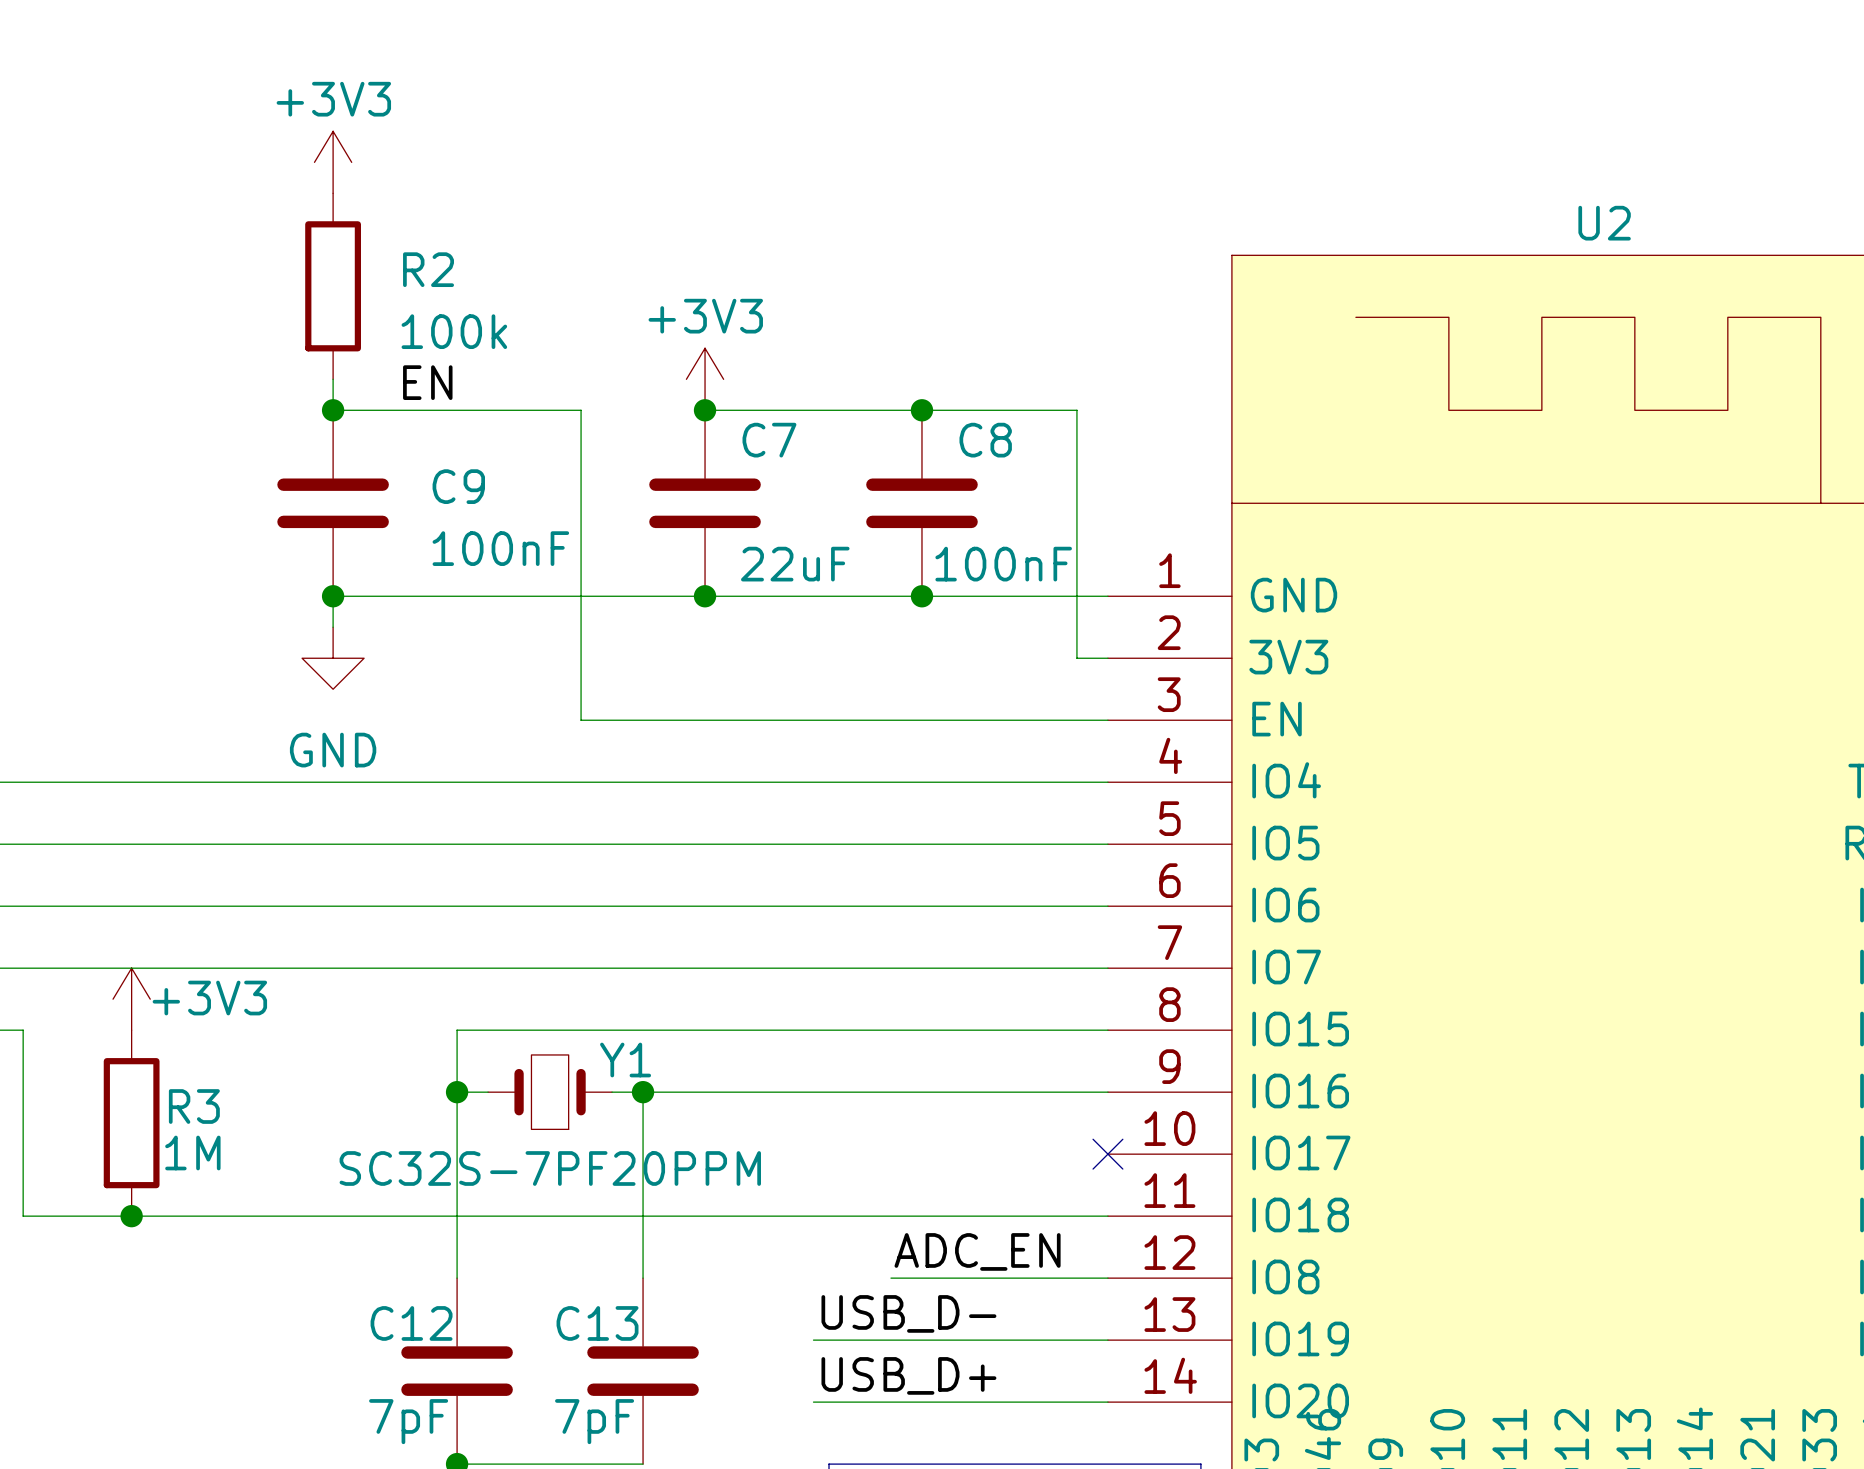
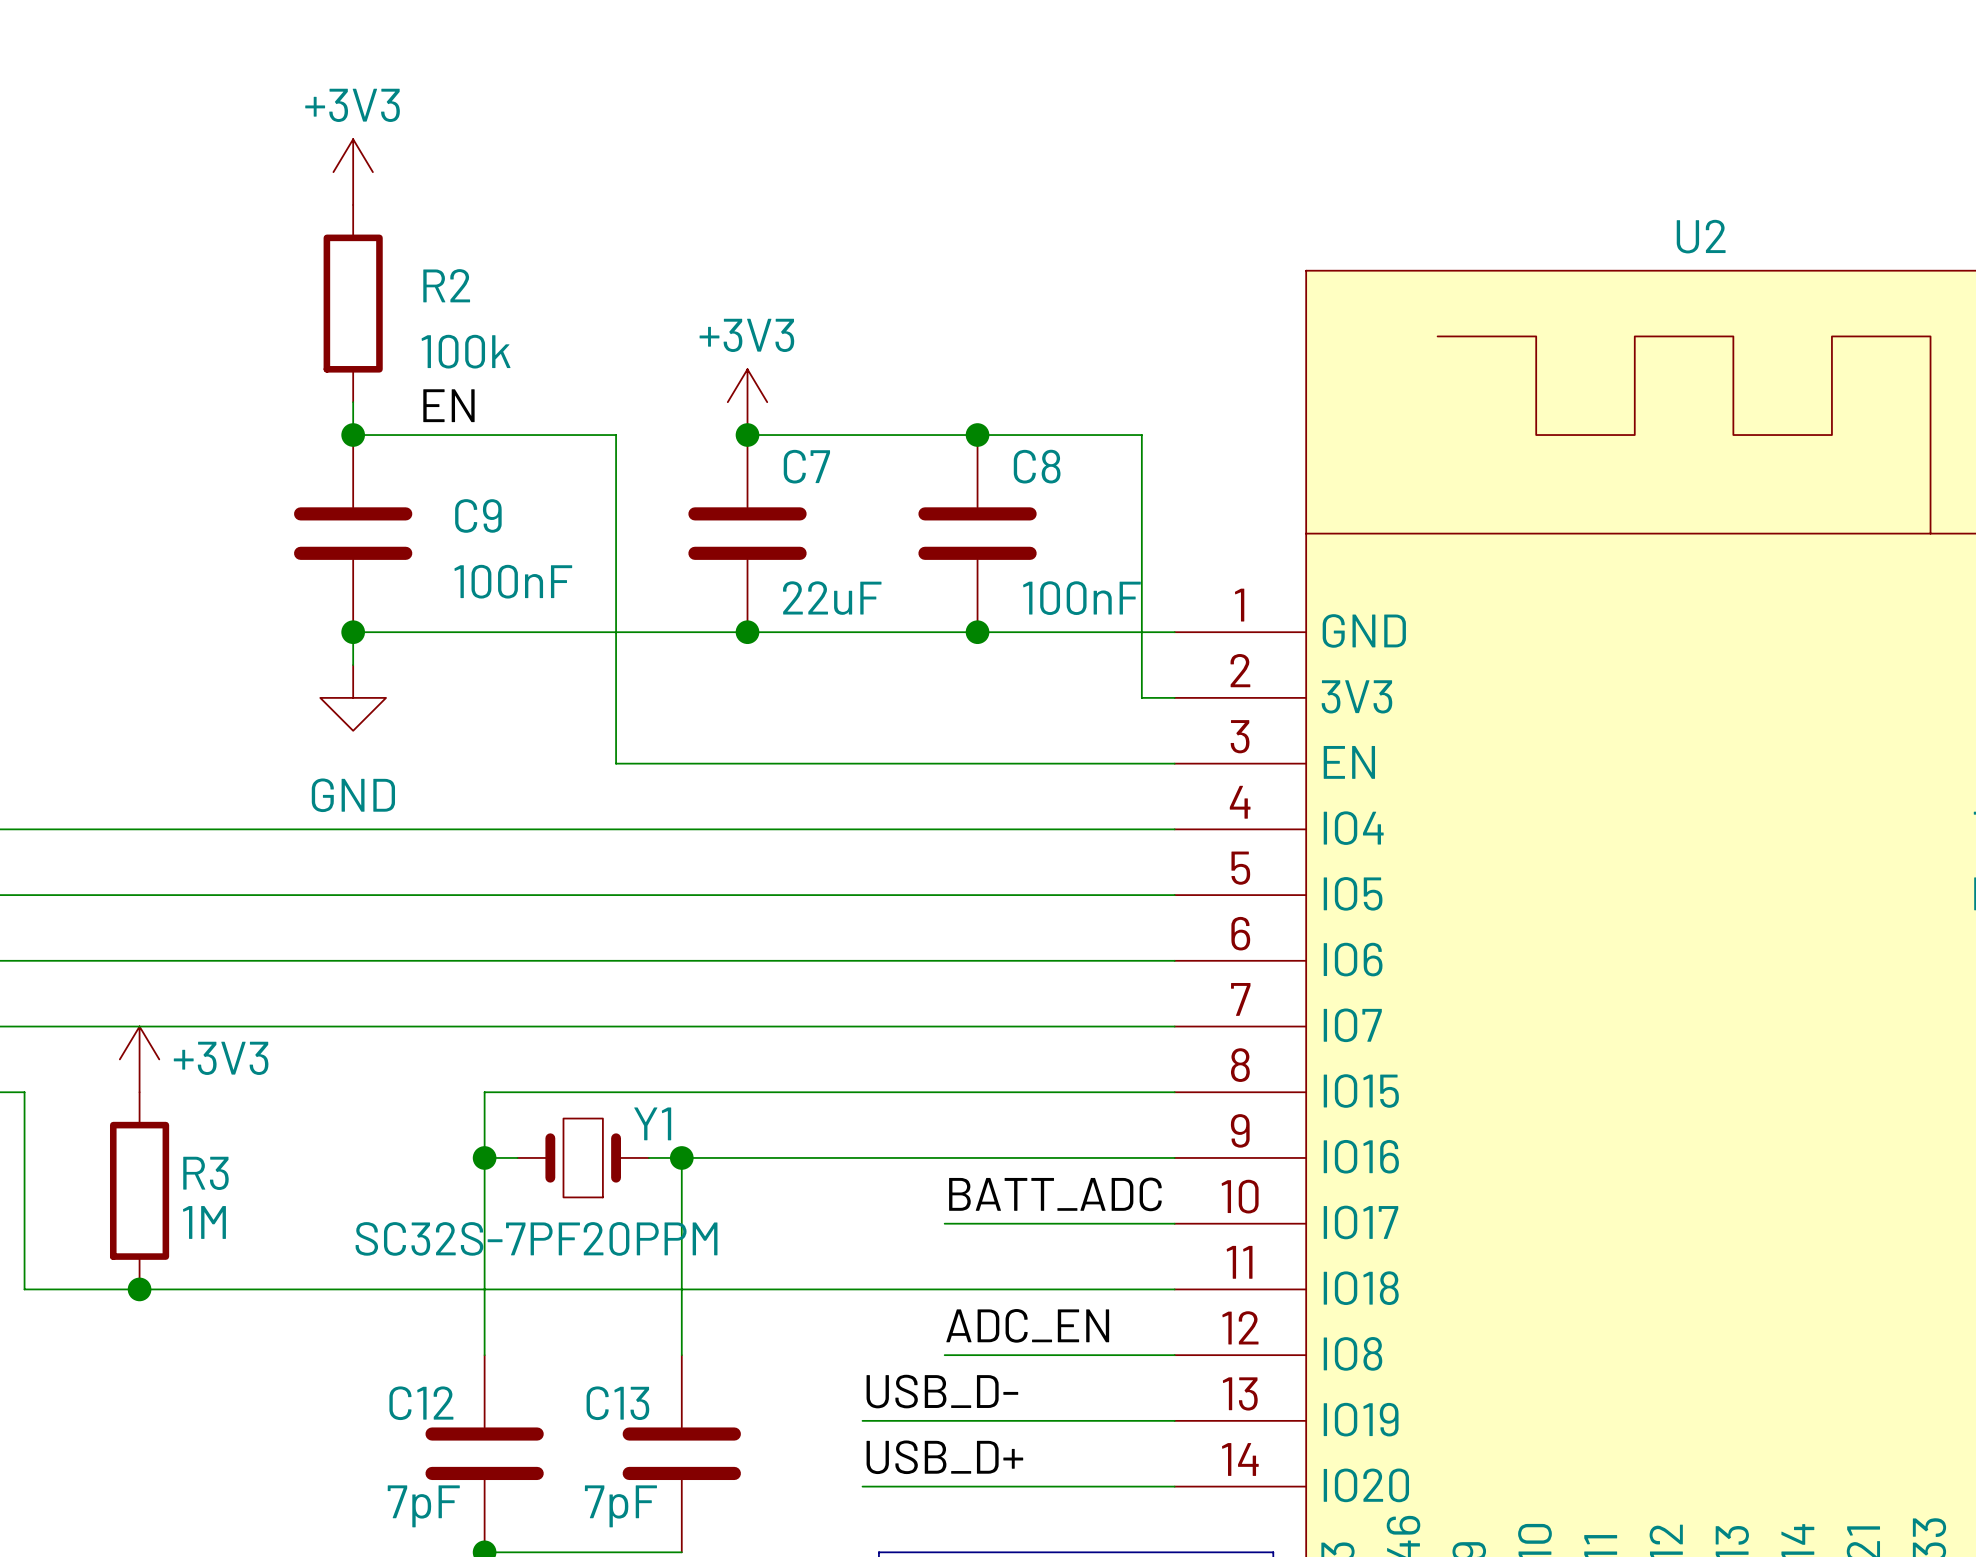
label: none -> BATT_ADC (1055, 1194)
wire: none -> (944, 1223) (1174, 1223)
no-connect mark: (1107, 1154) -> none

